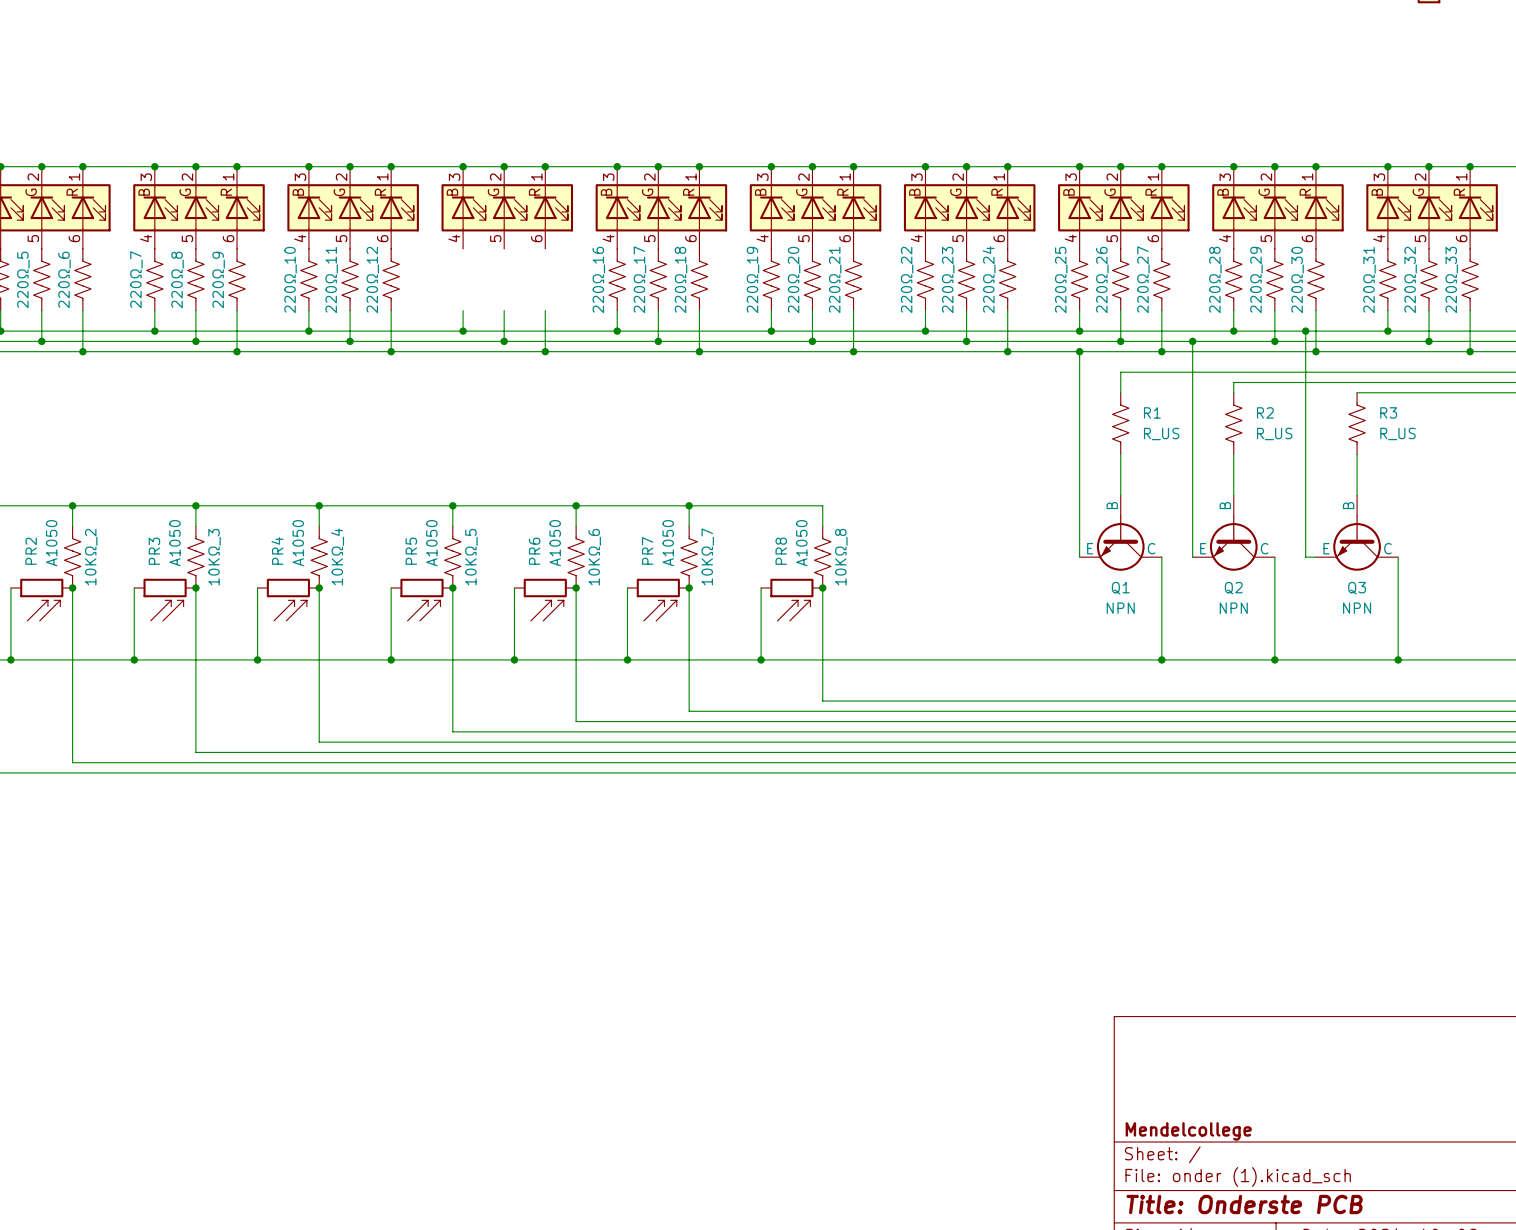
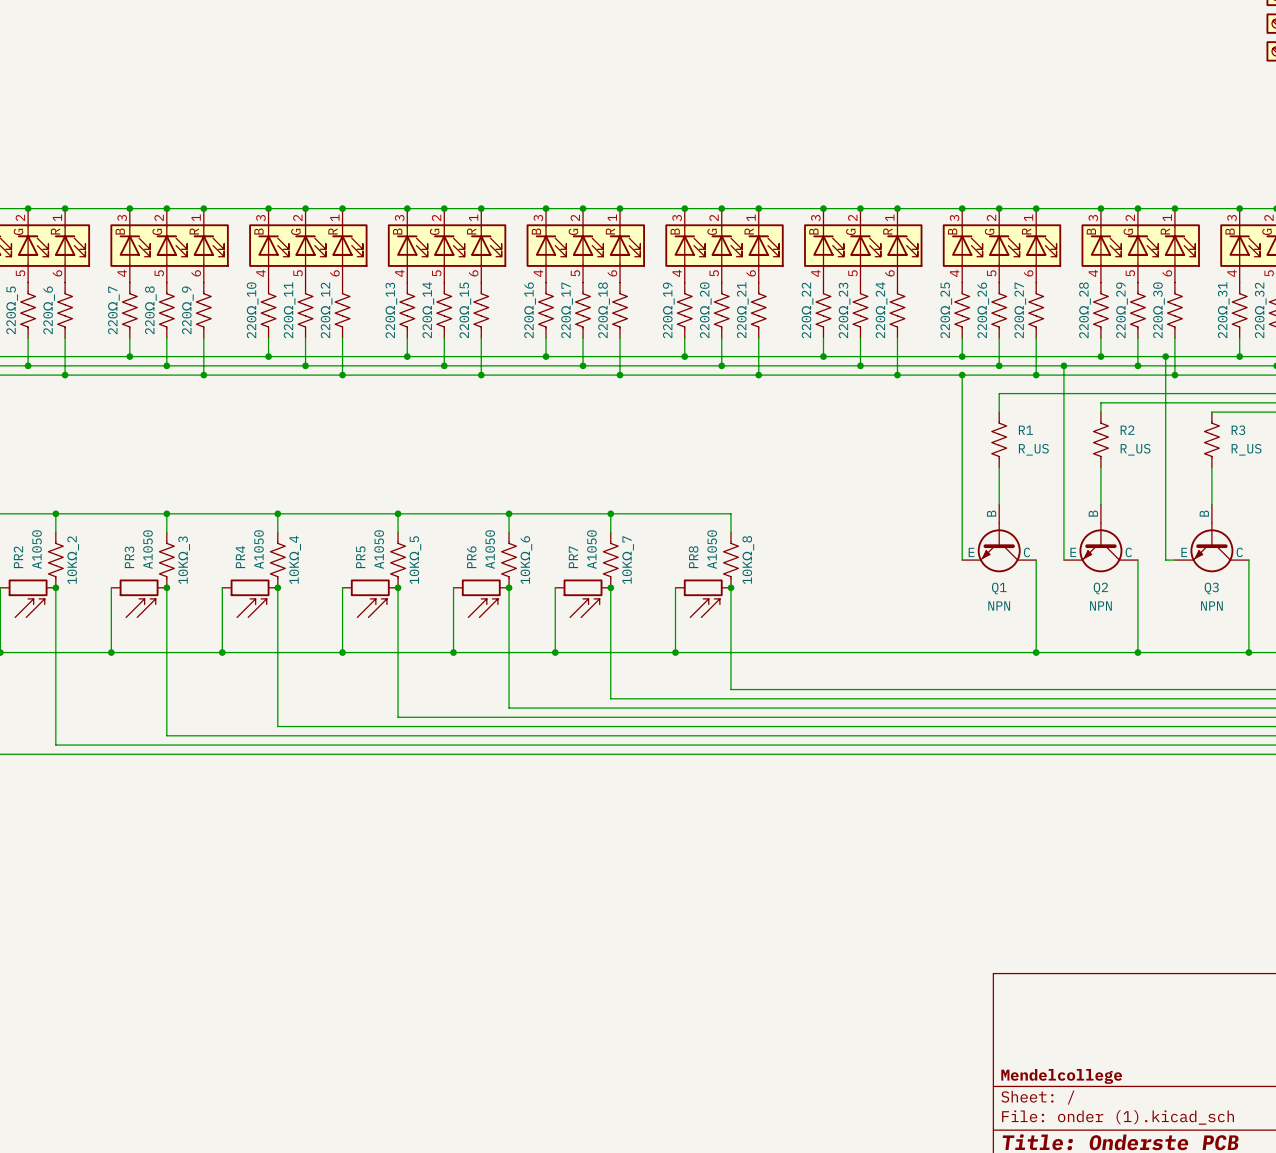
220Ω_13: none -> (407, 310)
220Ω_14: none -> (444, 310)
220Ω_15: none -> (481, 310)

